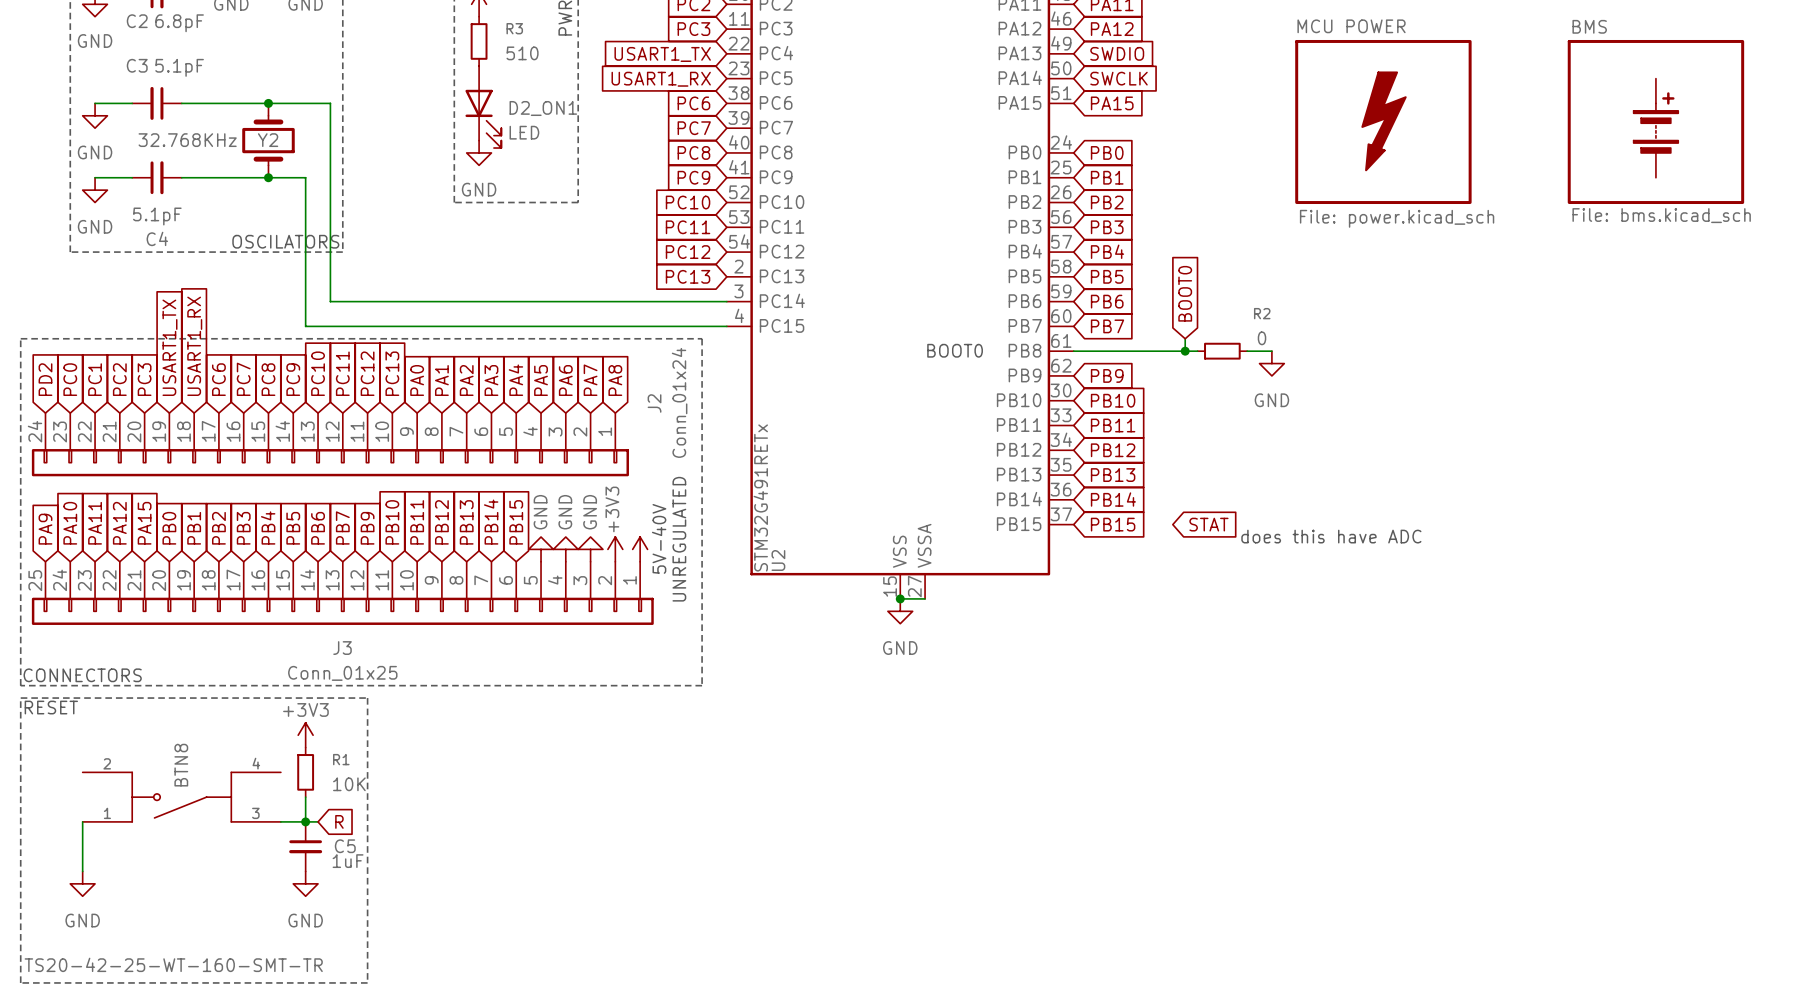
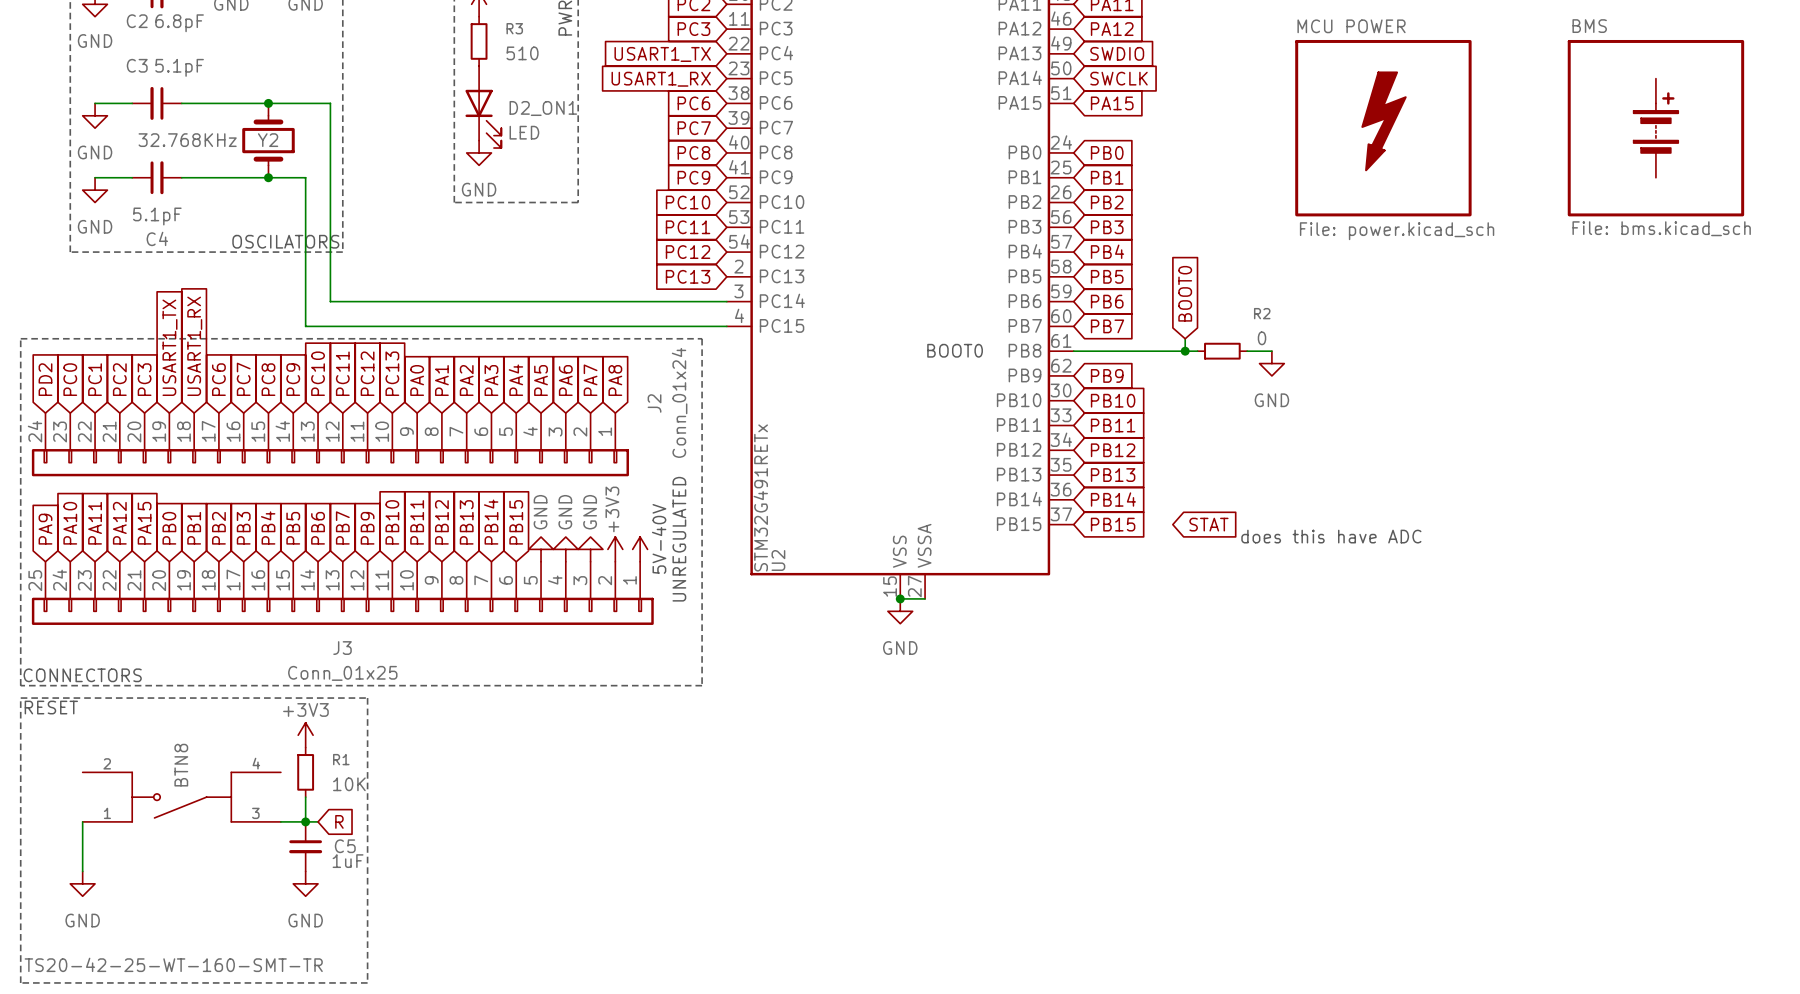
sheet MCU POWER shape: [1295, 39, 1472, 205] -> [1295, 39, 1472, 217]
sheet BMS shape: [1567, 39, 1745, 205] -> [1567, 39, 1745, 217]

